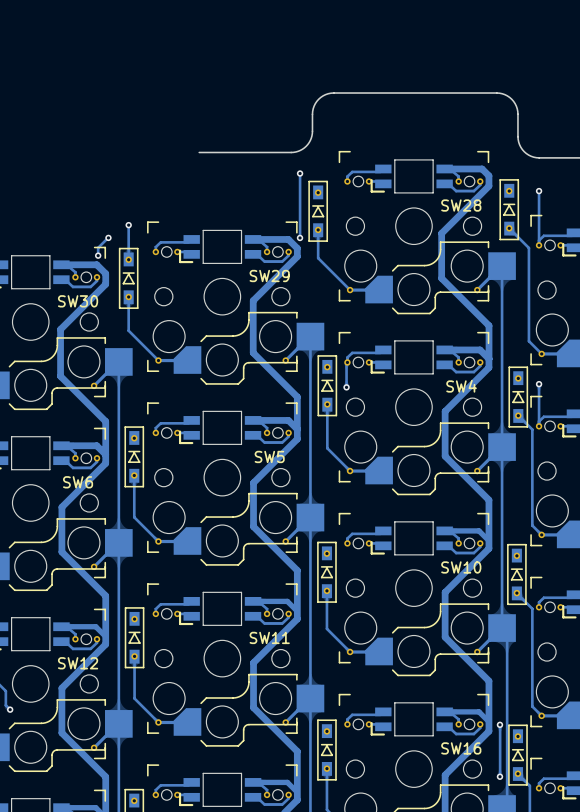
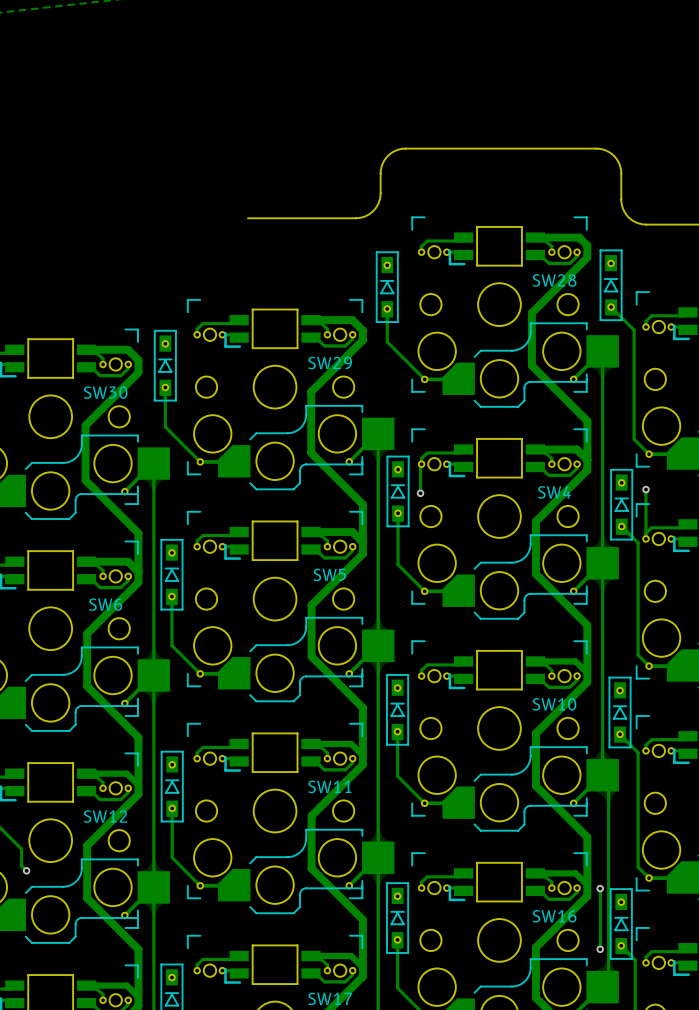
track: (300, 173) (300, 237) -> none
via: (300, 173) -> none
track: (539, 191) (539, 245) -> none
via: (539, 191) -> none
track: (128, 225) (128, 259) -> none
via: (128, 225) -> none
track: (108, 237) (98, 247) (98, 255) -> none
via: (108, 237) -> none
via: (300, 237) -> none
via: (98, 255) -> none

